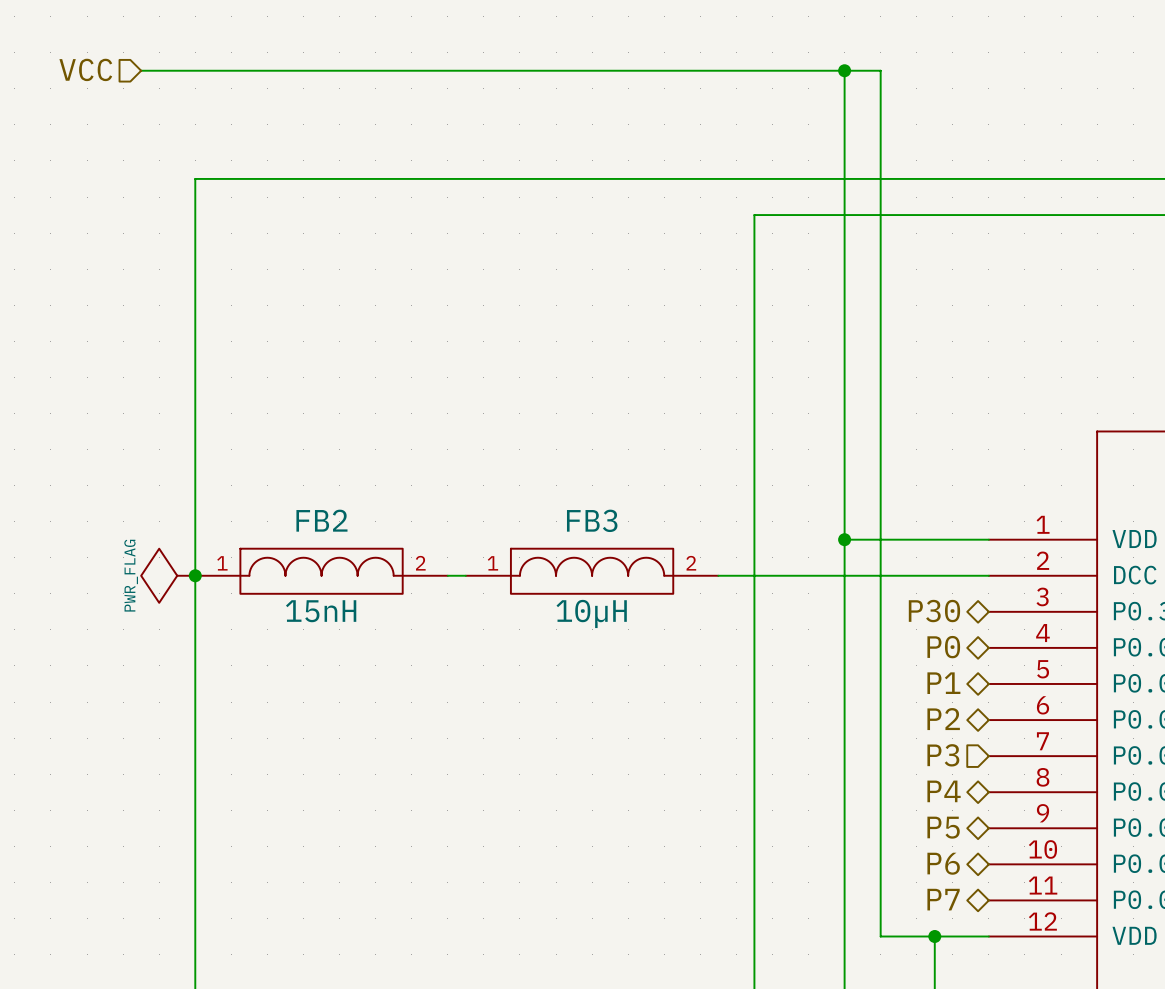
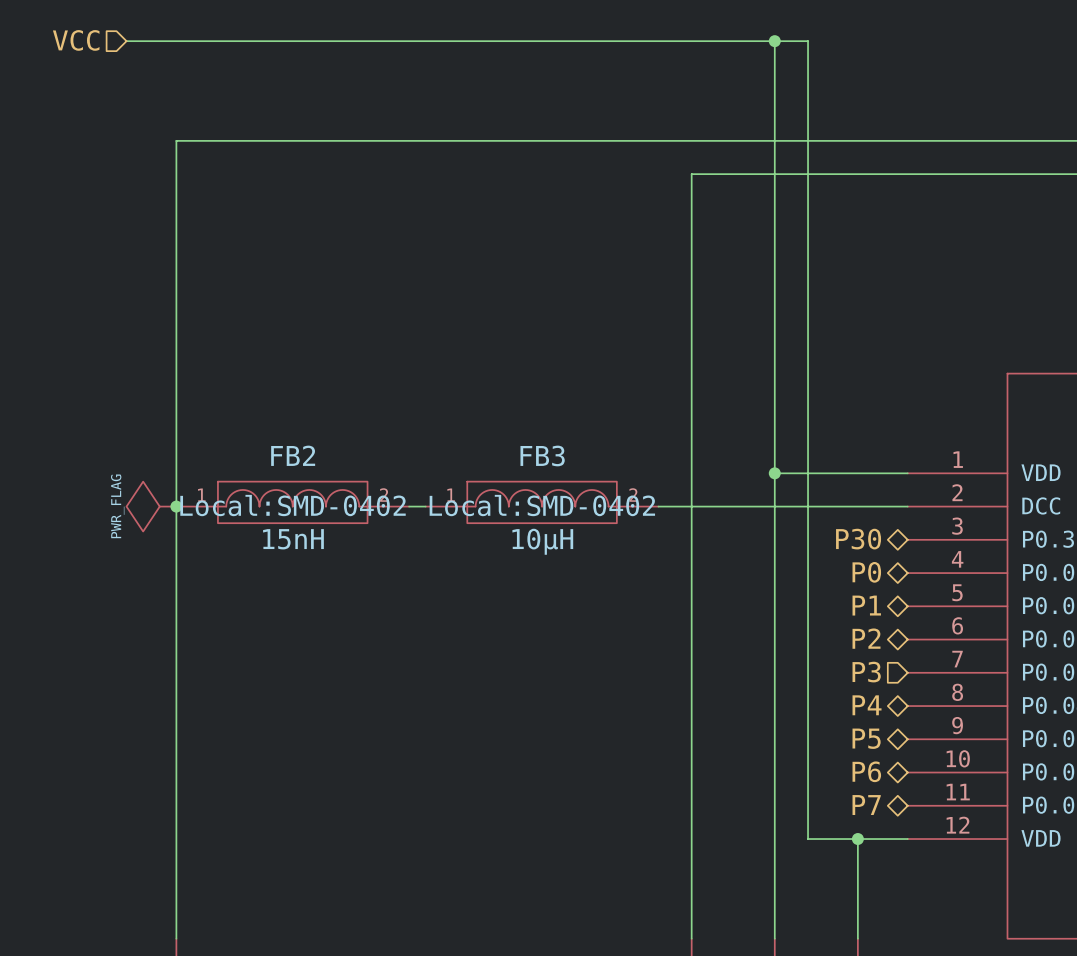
FB2 text: none -> Local:SMD-0402 (293, 505)
FB3 text: none -> Local:SMD-0402 (542, 505)

